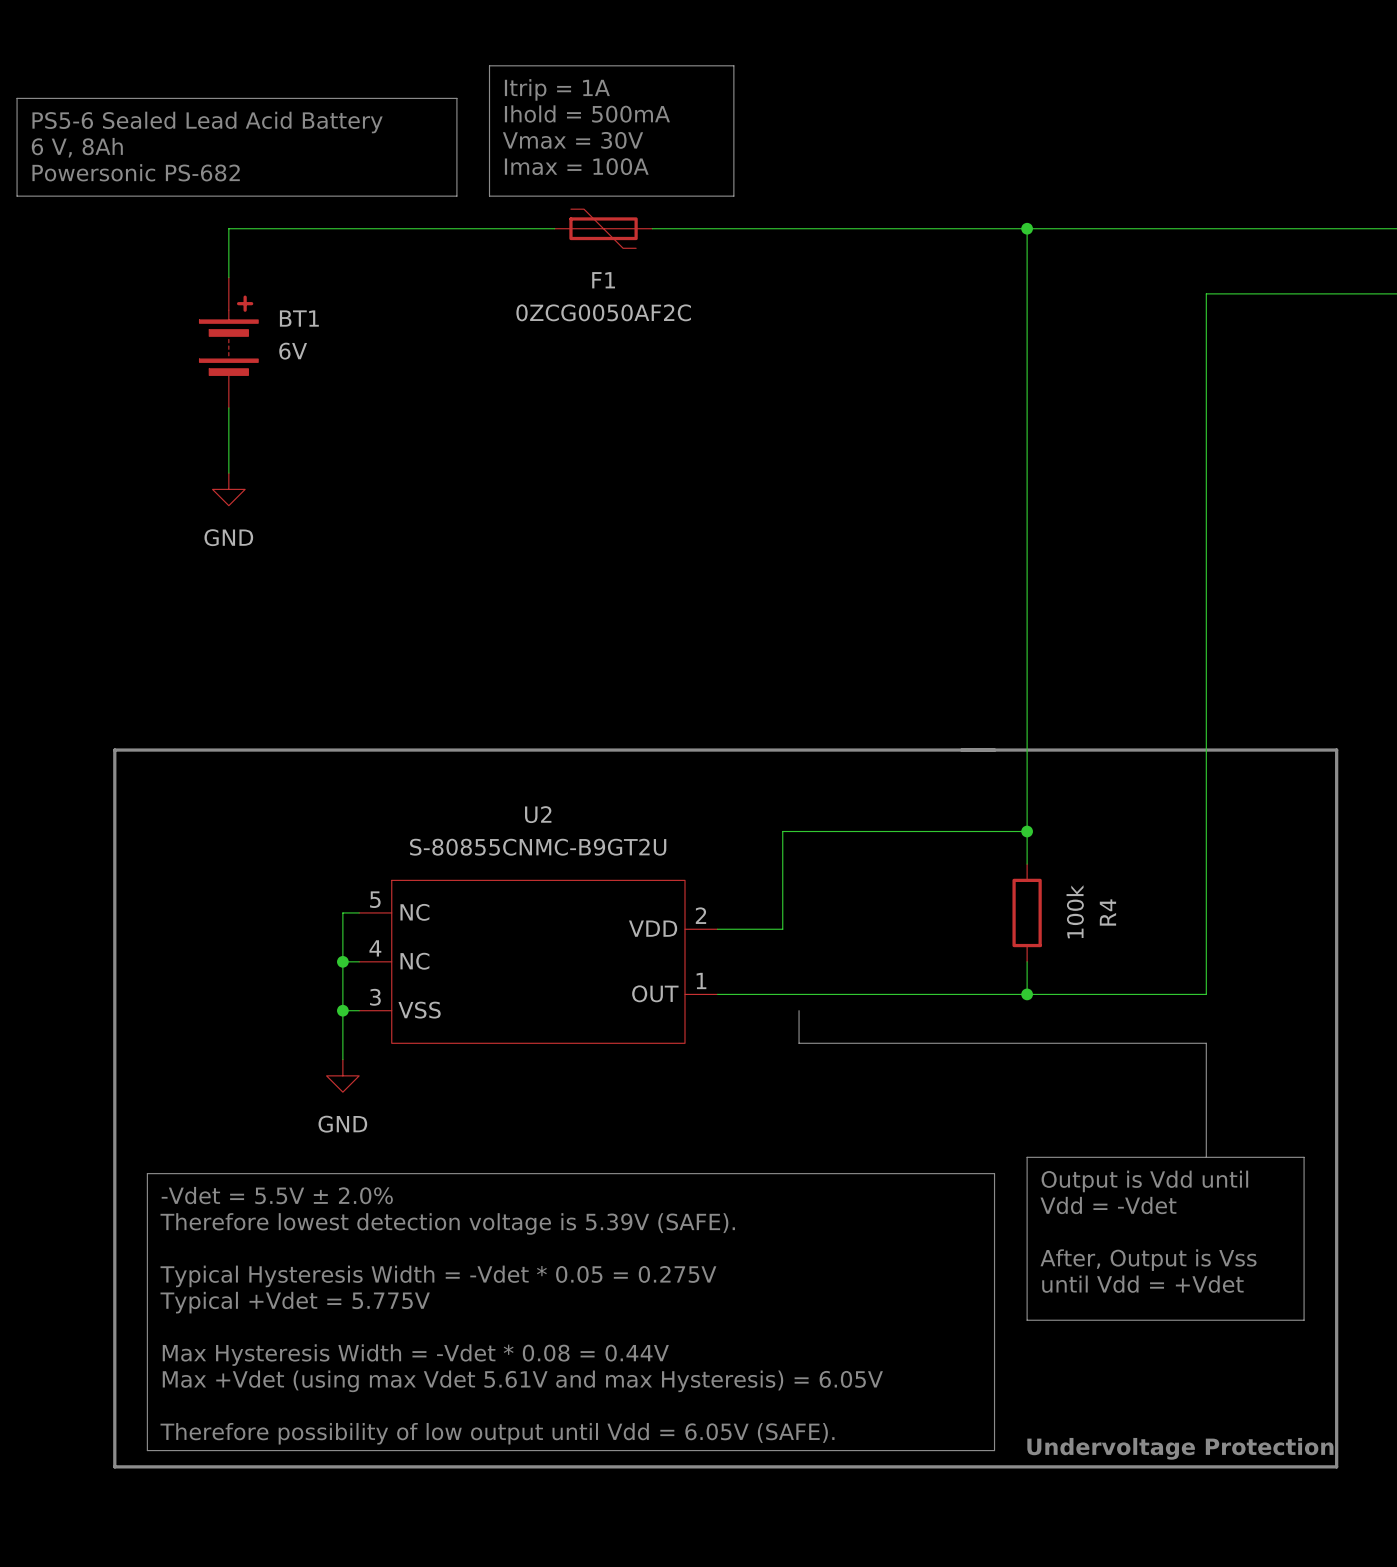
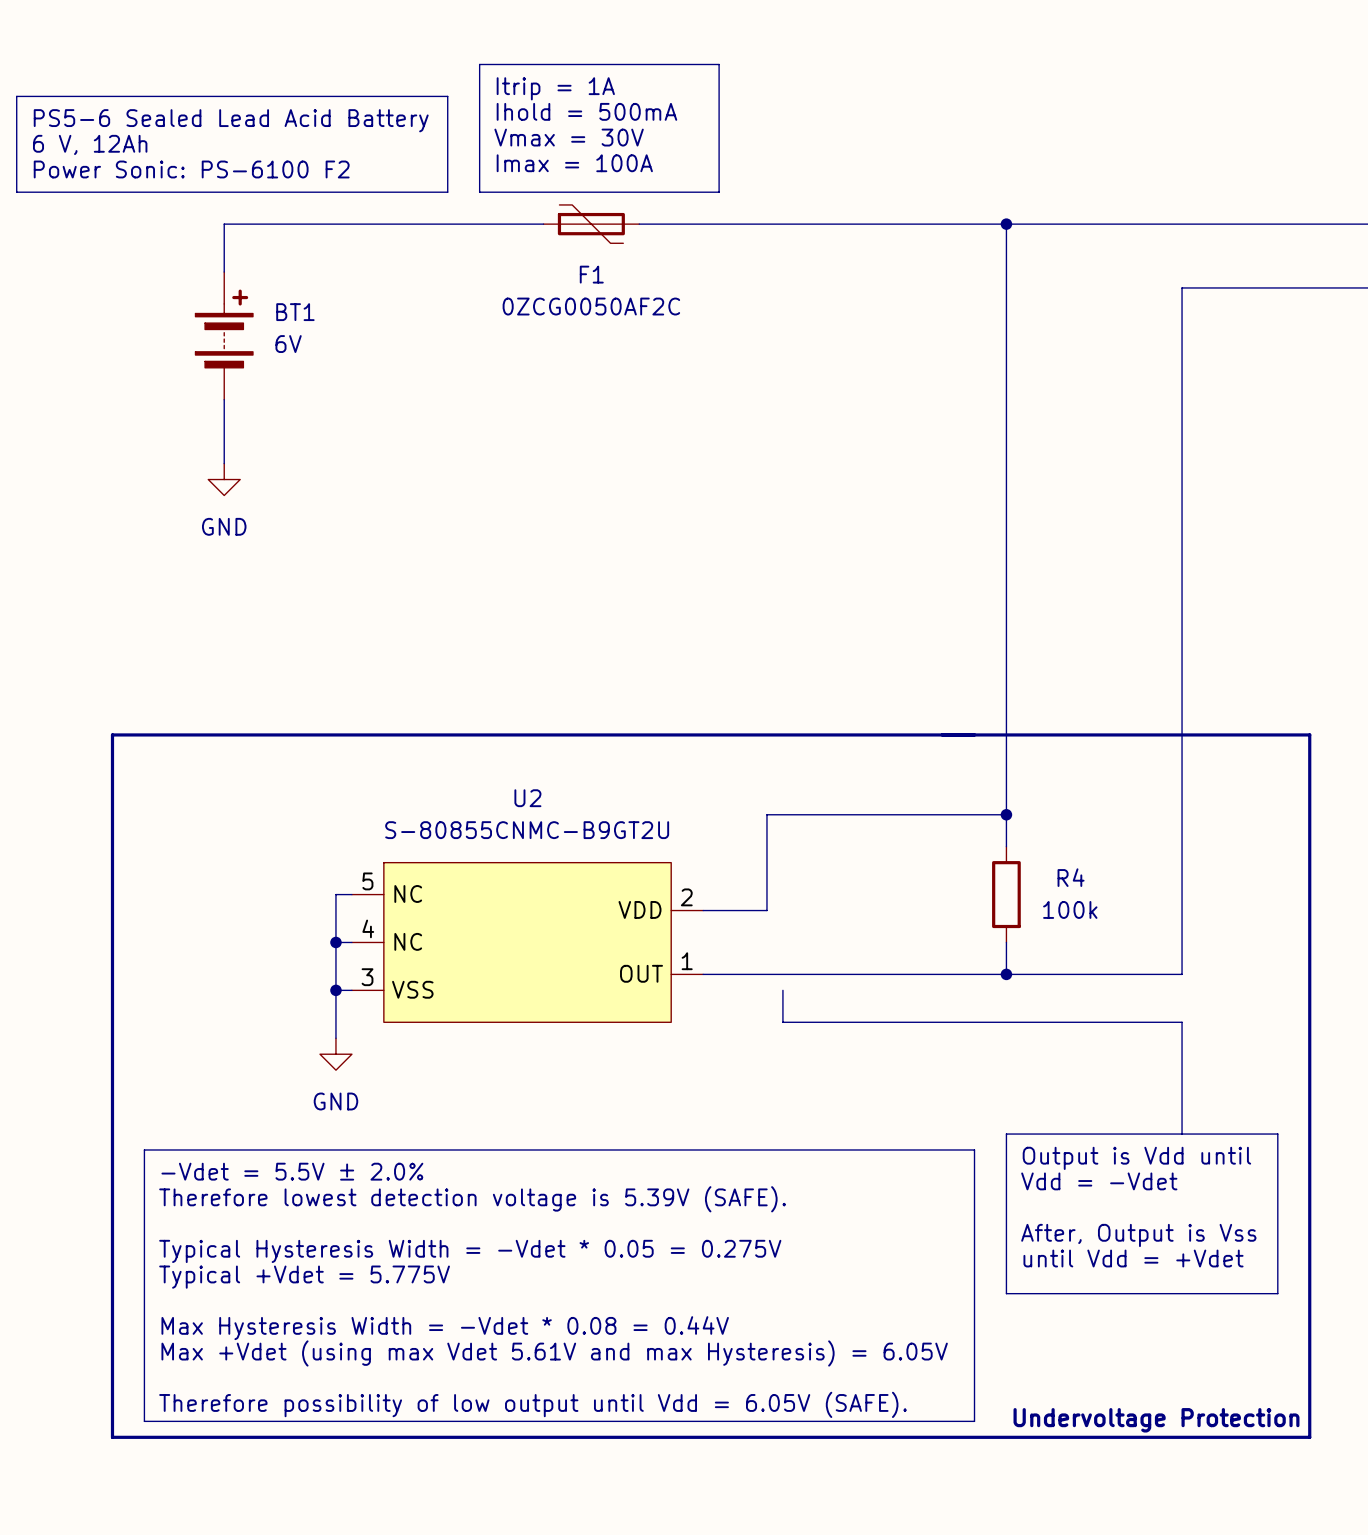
text: 6 V, 8Ah (77, 147) -> 6 V, 12Ah (90, 144)
text: Powersonic PS-682 (136, 172) -> Power Sonic: PS-6100 F2 (191, 169)
R4 value rotation: 0° (1075, 911) -> 90° clockwise (1070, 909)
R4 name rotation: 0° (1107, 912) -> 90° clockwise (1071, 877)

